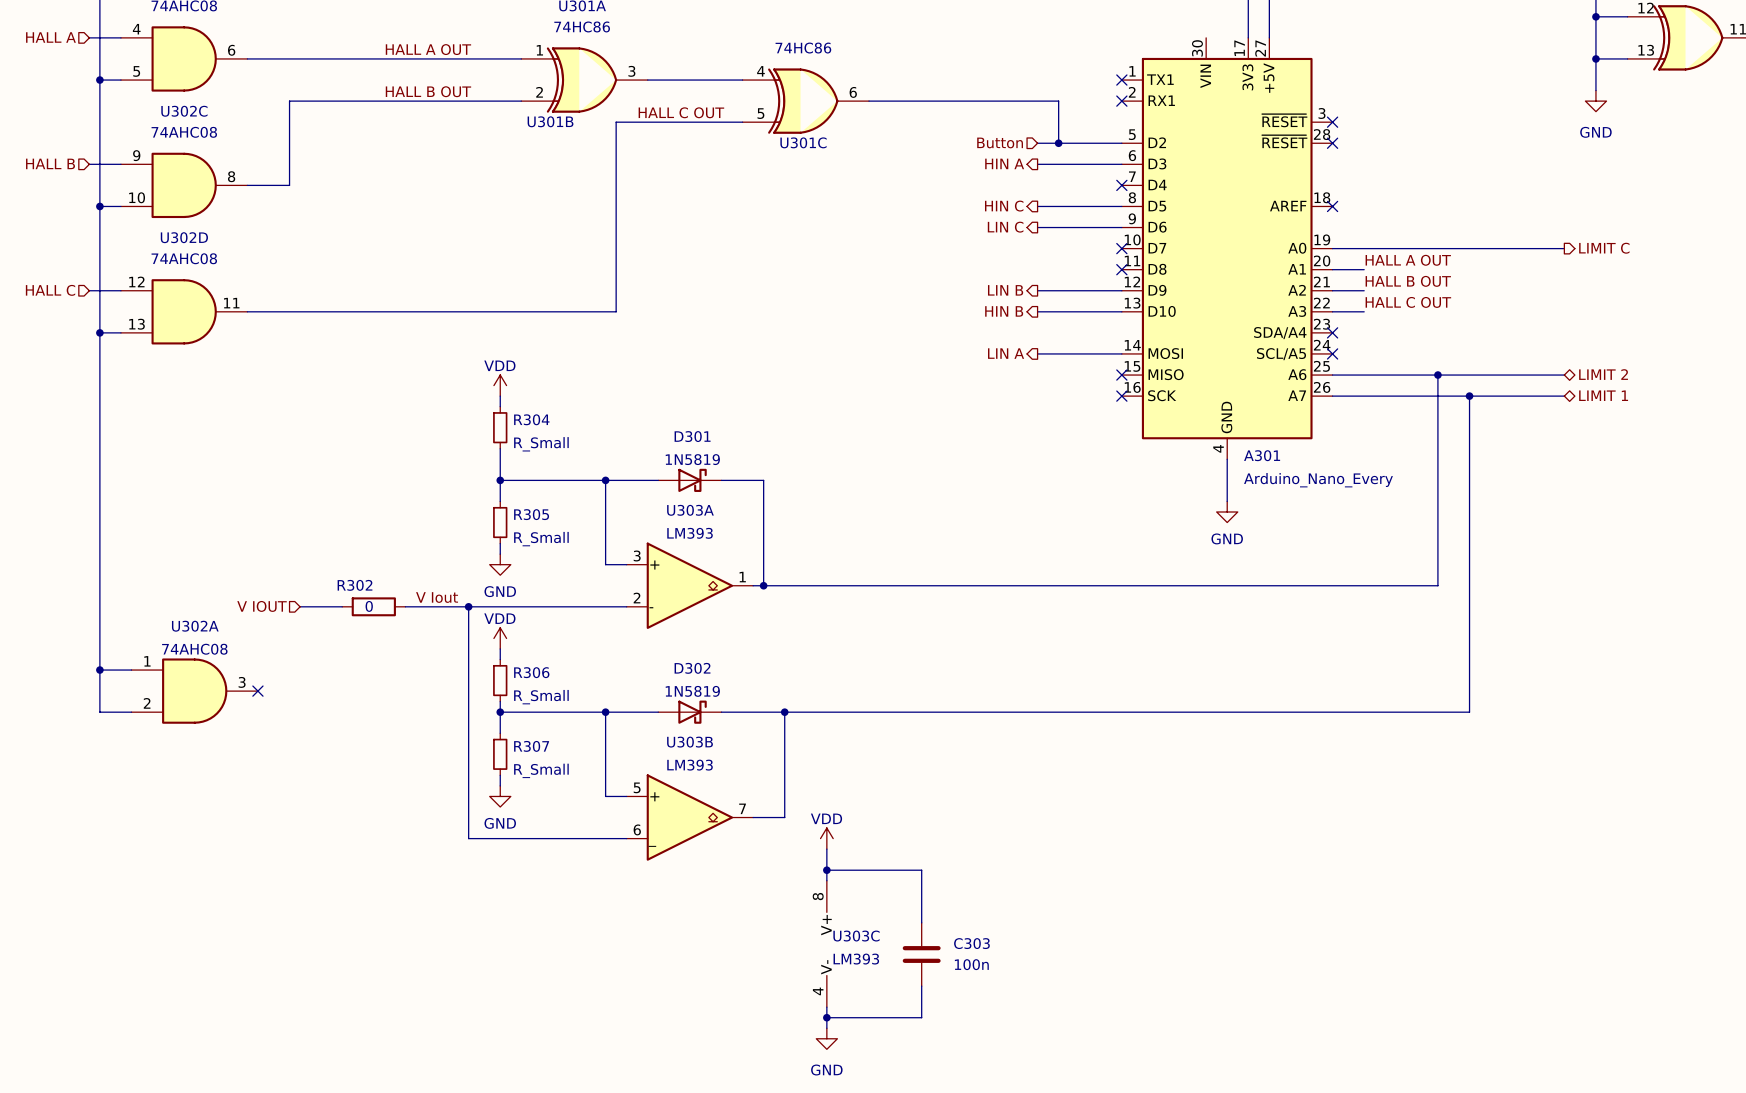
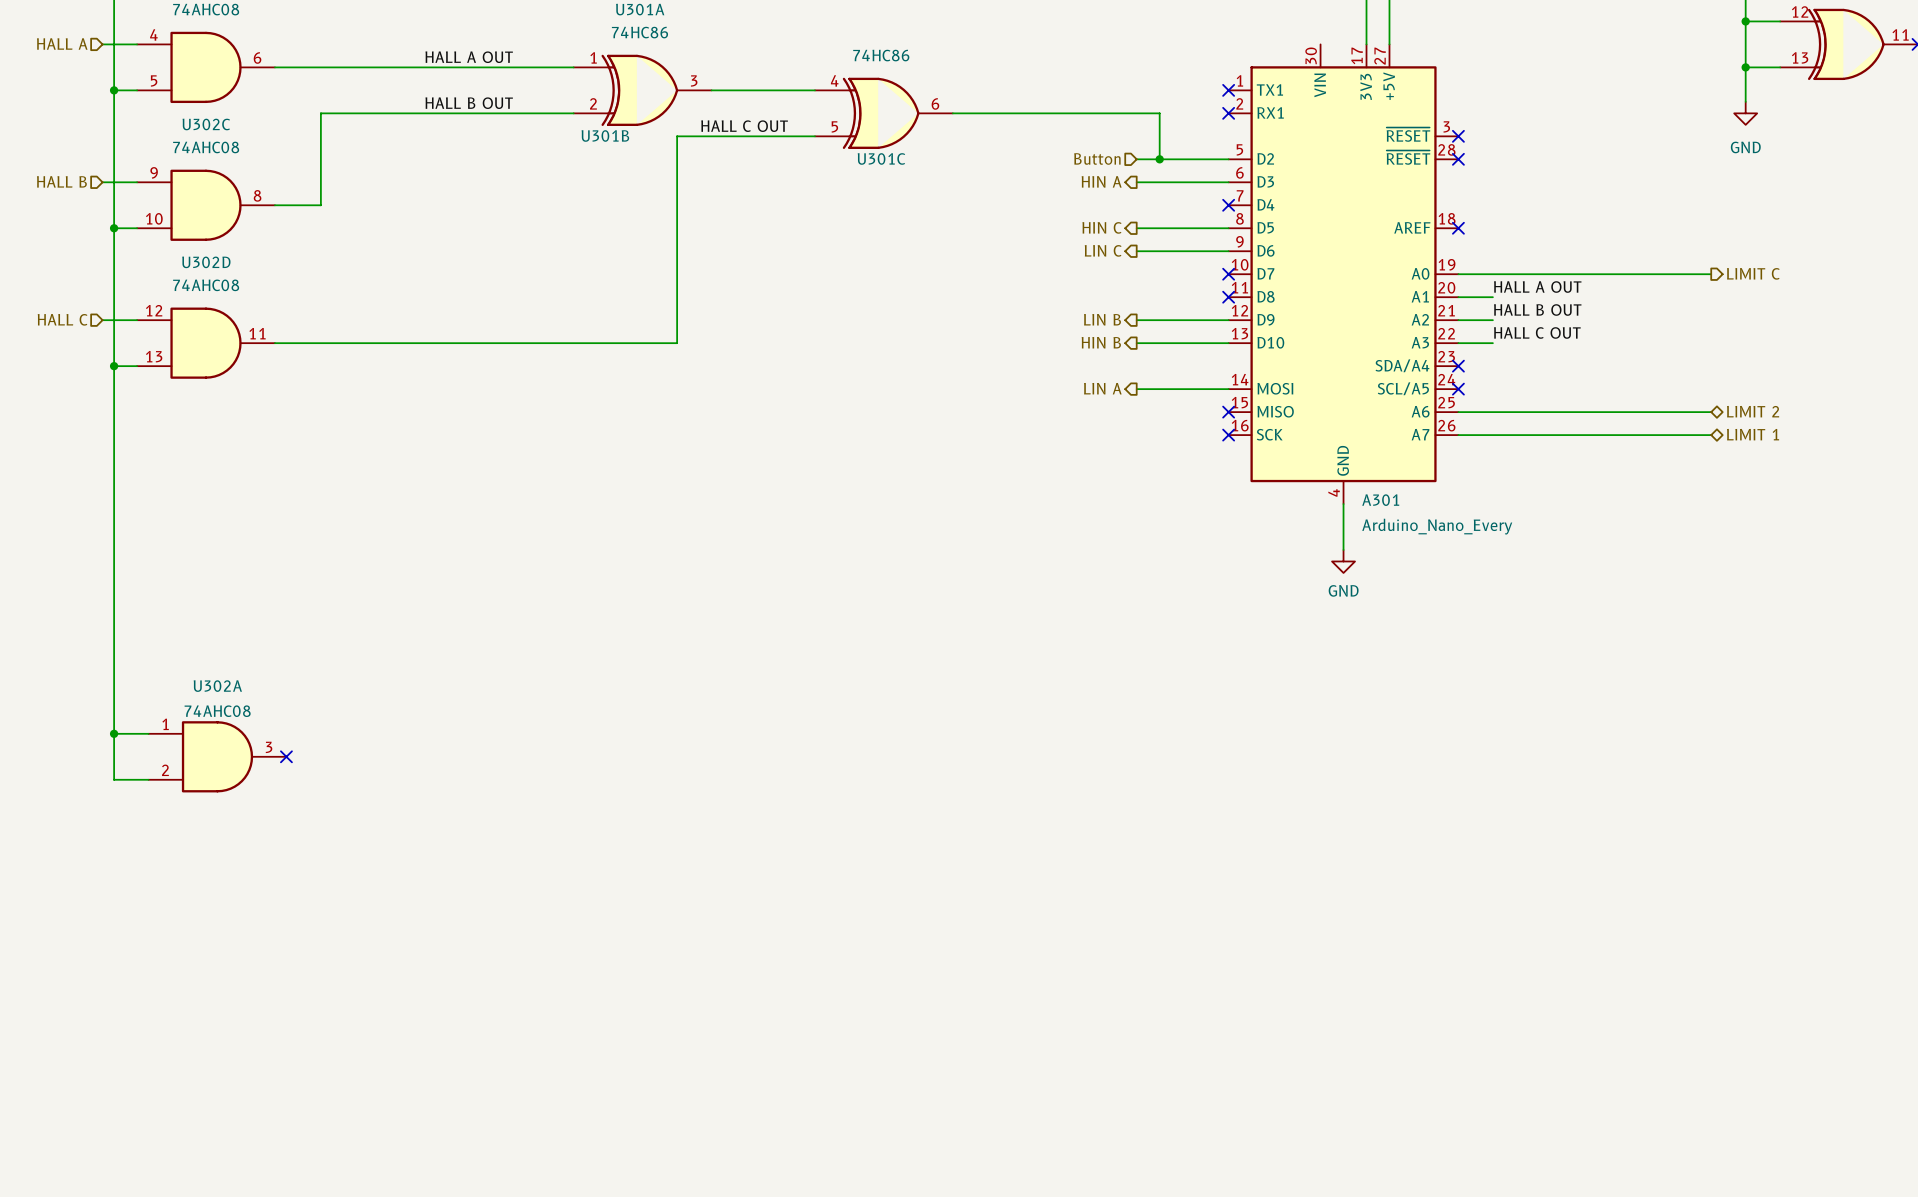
wire: (1437, 375) (1437, 585) (753, 585) -> none
junction: (1437, 375) -> none
power symbol: VDD (500, 385) -> none
wire: (500, 396) (500, 406) -> none
wire: (1469, 396) (1469, 712) (721, 712) -> none
junction: (1469, 396) -> none
R304: R_Small (500, 427) -> none
wire: (500, 448) (500, 501) -> none
wire: (500, 480) (658, 480) -> none
junction: (500, 480) -> none
wire: (605, 480) (605, 564) (626, 564) -> none
junction: (605, 480) -> none
D301: 1N5819 (689, 480) -> none
wire: (721, 480) (763, 480) (763, 585) -> none
R305: R_Small (500, 522) -> none
wire: (500, 543) (500, 554) -> none
power symbol: GND (500, 564) -> none
U303A: LM393 (689, 585) -> none
junction: (763, 585) -> none
label: V Iout (437, 597) -> none
hierarchical label: V IOUT (262, 606) -> none
wire: (300, 606) (342, 606) -> none
R302: 0 (373, 606) -> none
wire: (405, 606) (626, 606) -> none
wire: (468, 606) (468, 838) (626, 838) -> none
junction: (468, 606) -> none
power symbol: VDD (500, 638) -> none
wire: (500, 648) (500, 659) -> none
R306: R_Small (500, 680) -> none
wire: (500, 701) (500, 733) -> none
wire: (500, 712) (658, 712) -> none
junction: (500, 712) -> none
wire: (605, 712) (605, 796) (626, 796) -> none
junction: (605, 712) -> none
D302: 1N5819 (689, 712) -> none
wire: (784, 712) (784, 817) (753, 817) -> none
junction: (784, 712) -> none
R307: R_Small (500, 754) -> none
wire: (500, 775) (500, 785) -> none
power symbol: GND (500, 796) -> none
U303B: LM393 (689, 817) -> none
power symbol: VDD (826, 838) -> none
wire: (826, 849) (826, 880) -> none
wire: (826, 870) (921, 870) (921, 922) -> none
junction: (826, 870) -> none
U303C: LM393 (826, 943) -> none
C303: 100n (921, 954) -> none
wire: (921, 986) (921, 1017) (826, 1017) -> none
wire: (826, 1007) (826, 1028) -> none
junction: (826, 1017) -> none
power symbol: GND (826, 1038) -> none

